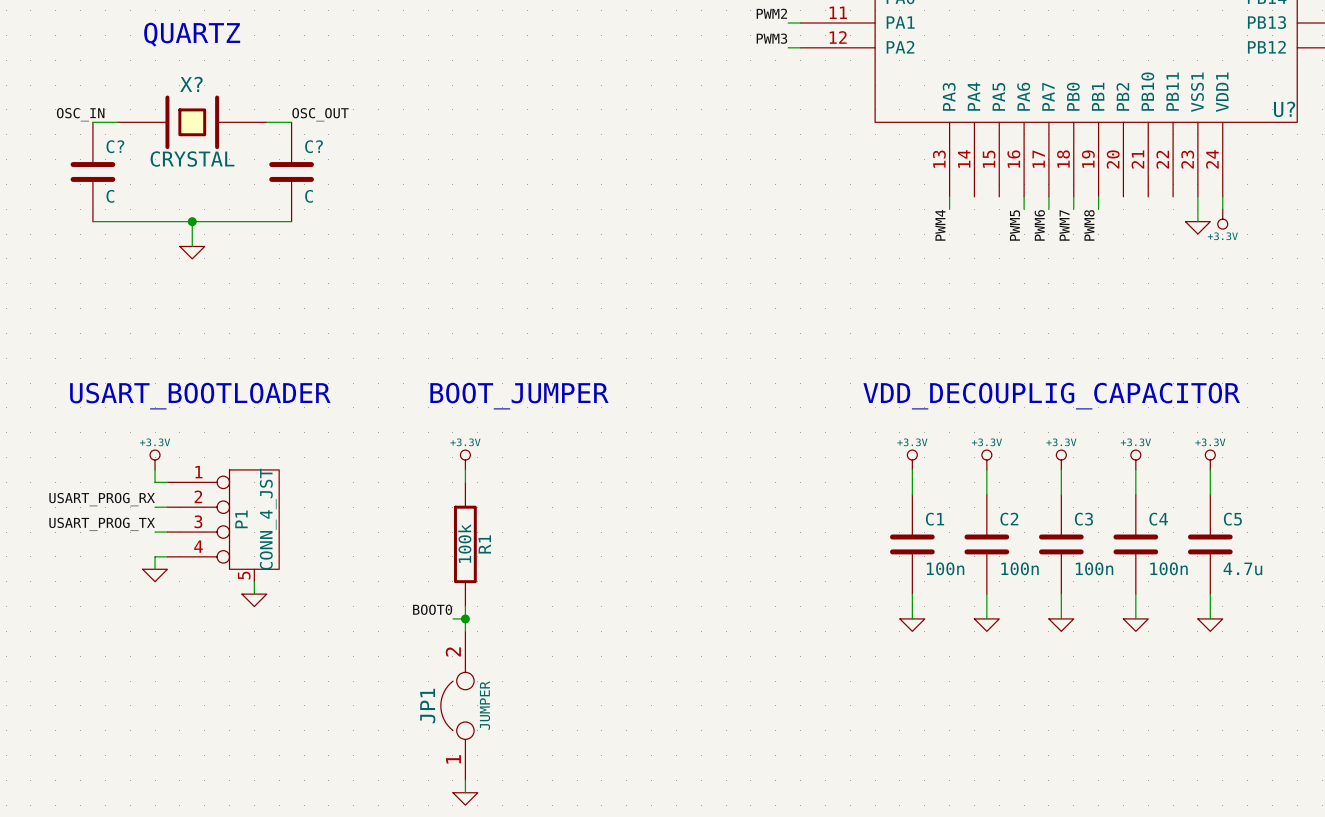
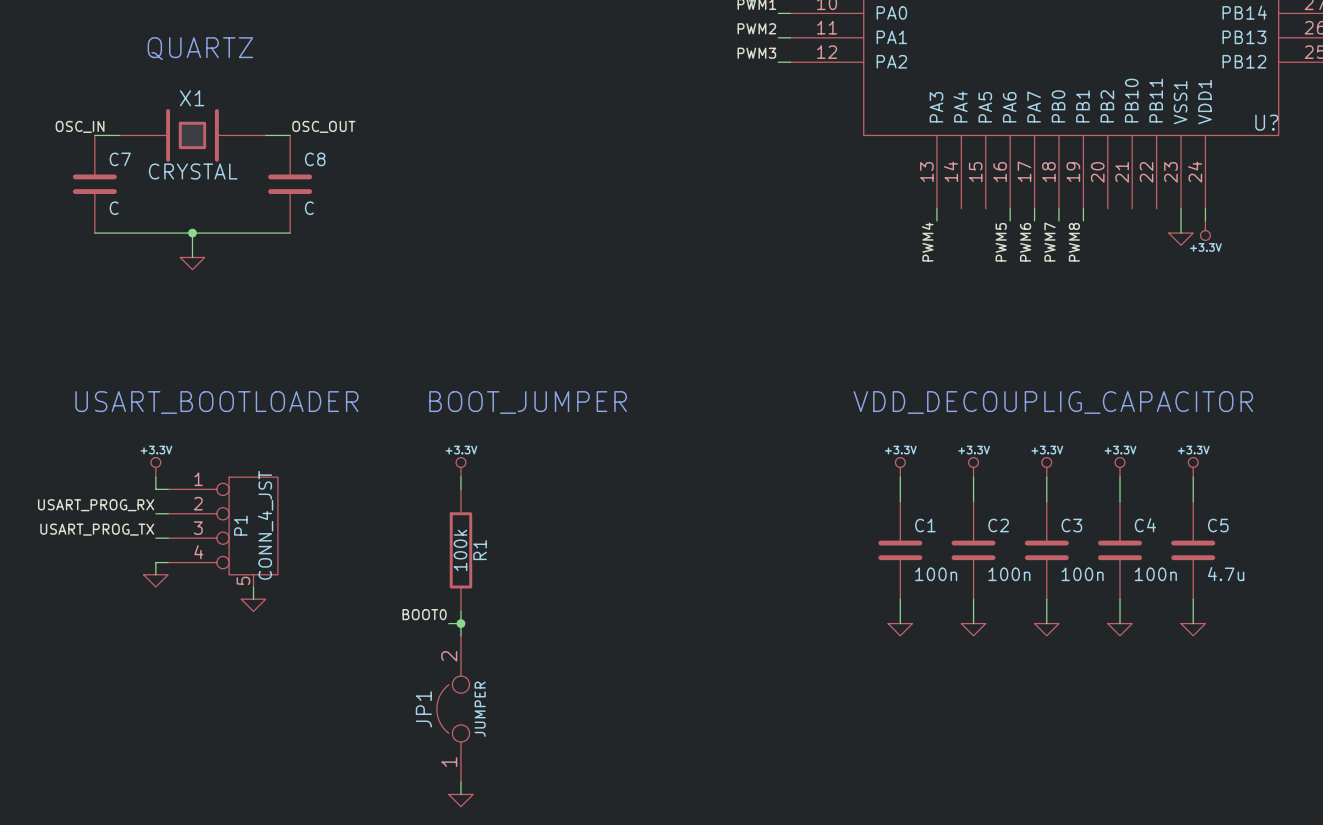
X? name: X? (191, 84) -> X1 (192, 98)
C? name: C? (115, 146) -> C7 (120, 159)
C? name: C? (314, 146) -> C8 (315, 159)

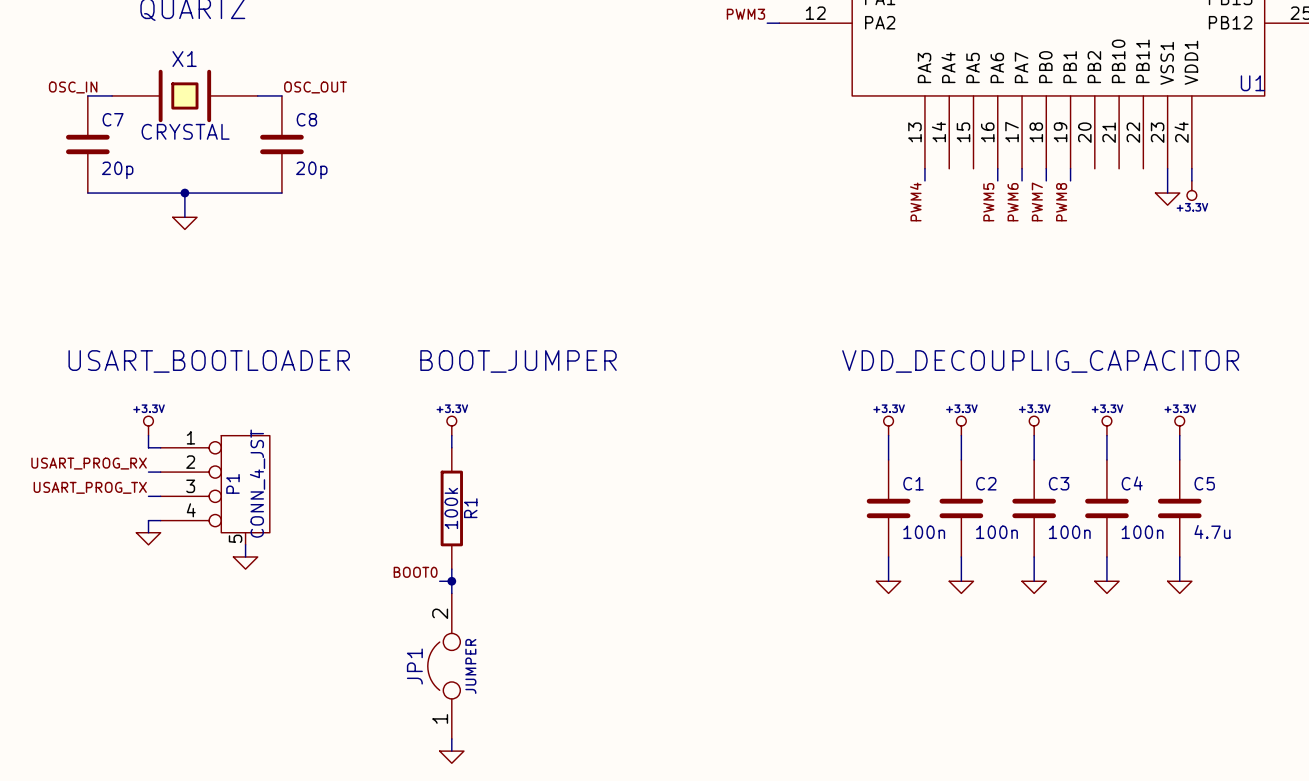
U? name: U? (1266, 122) -> U1 (1252, 83)
C7 value: C (114, 208) -> 20p (117, 170)
C8 value: C (309, 208) -> 20p (311, 170)

